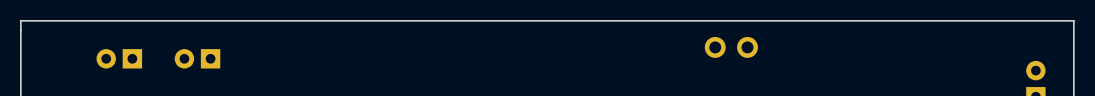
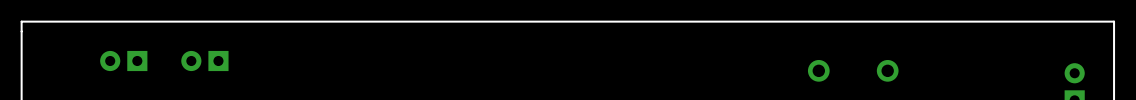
part: (715, 47) -> none
part: (747, 47) -> none
part: none -> (818, 70)
part: none -> (887, 70)

